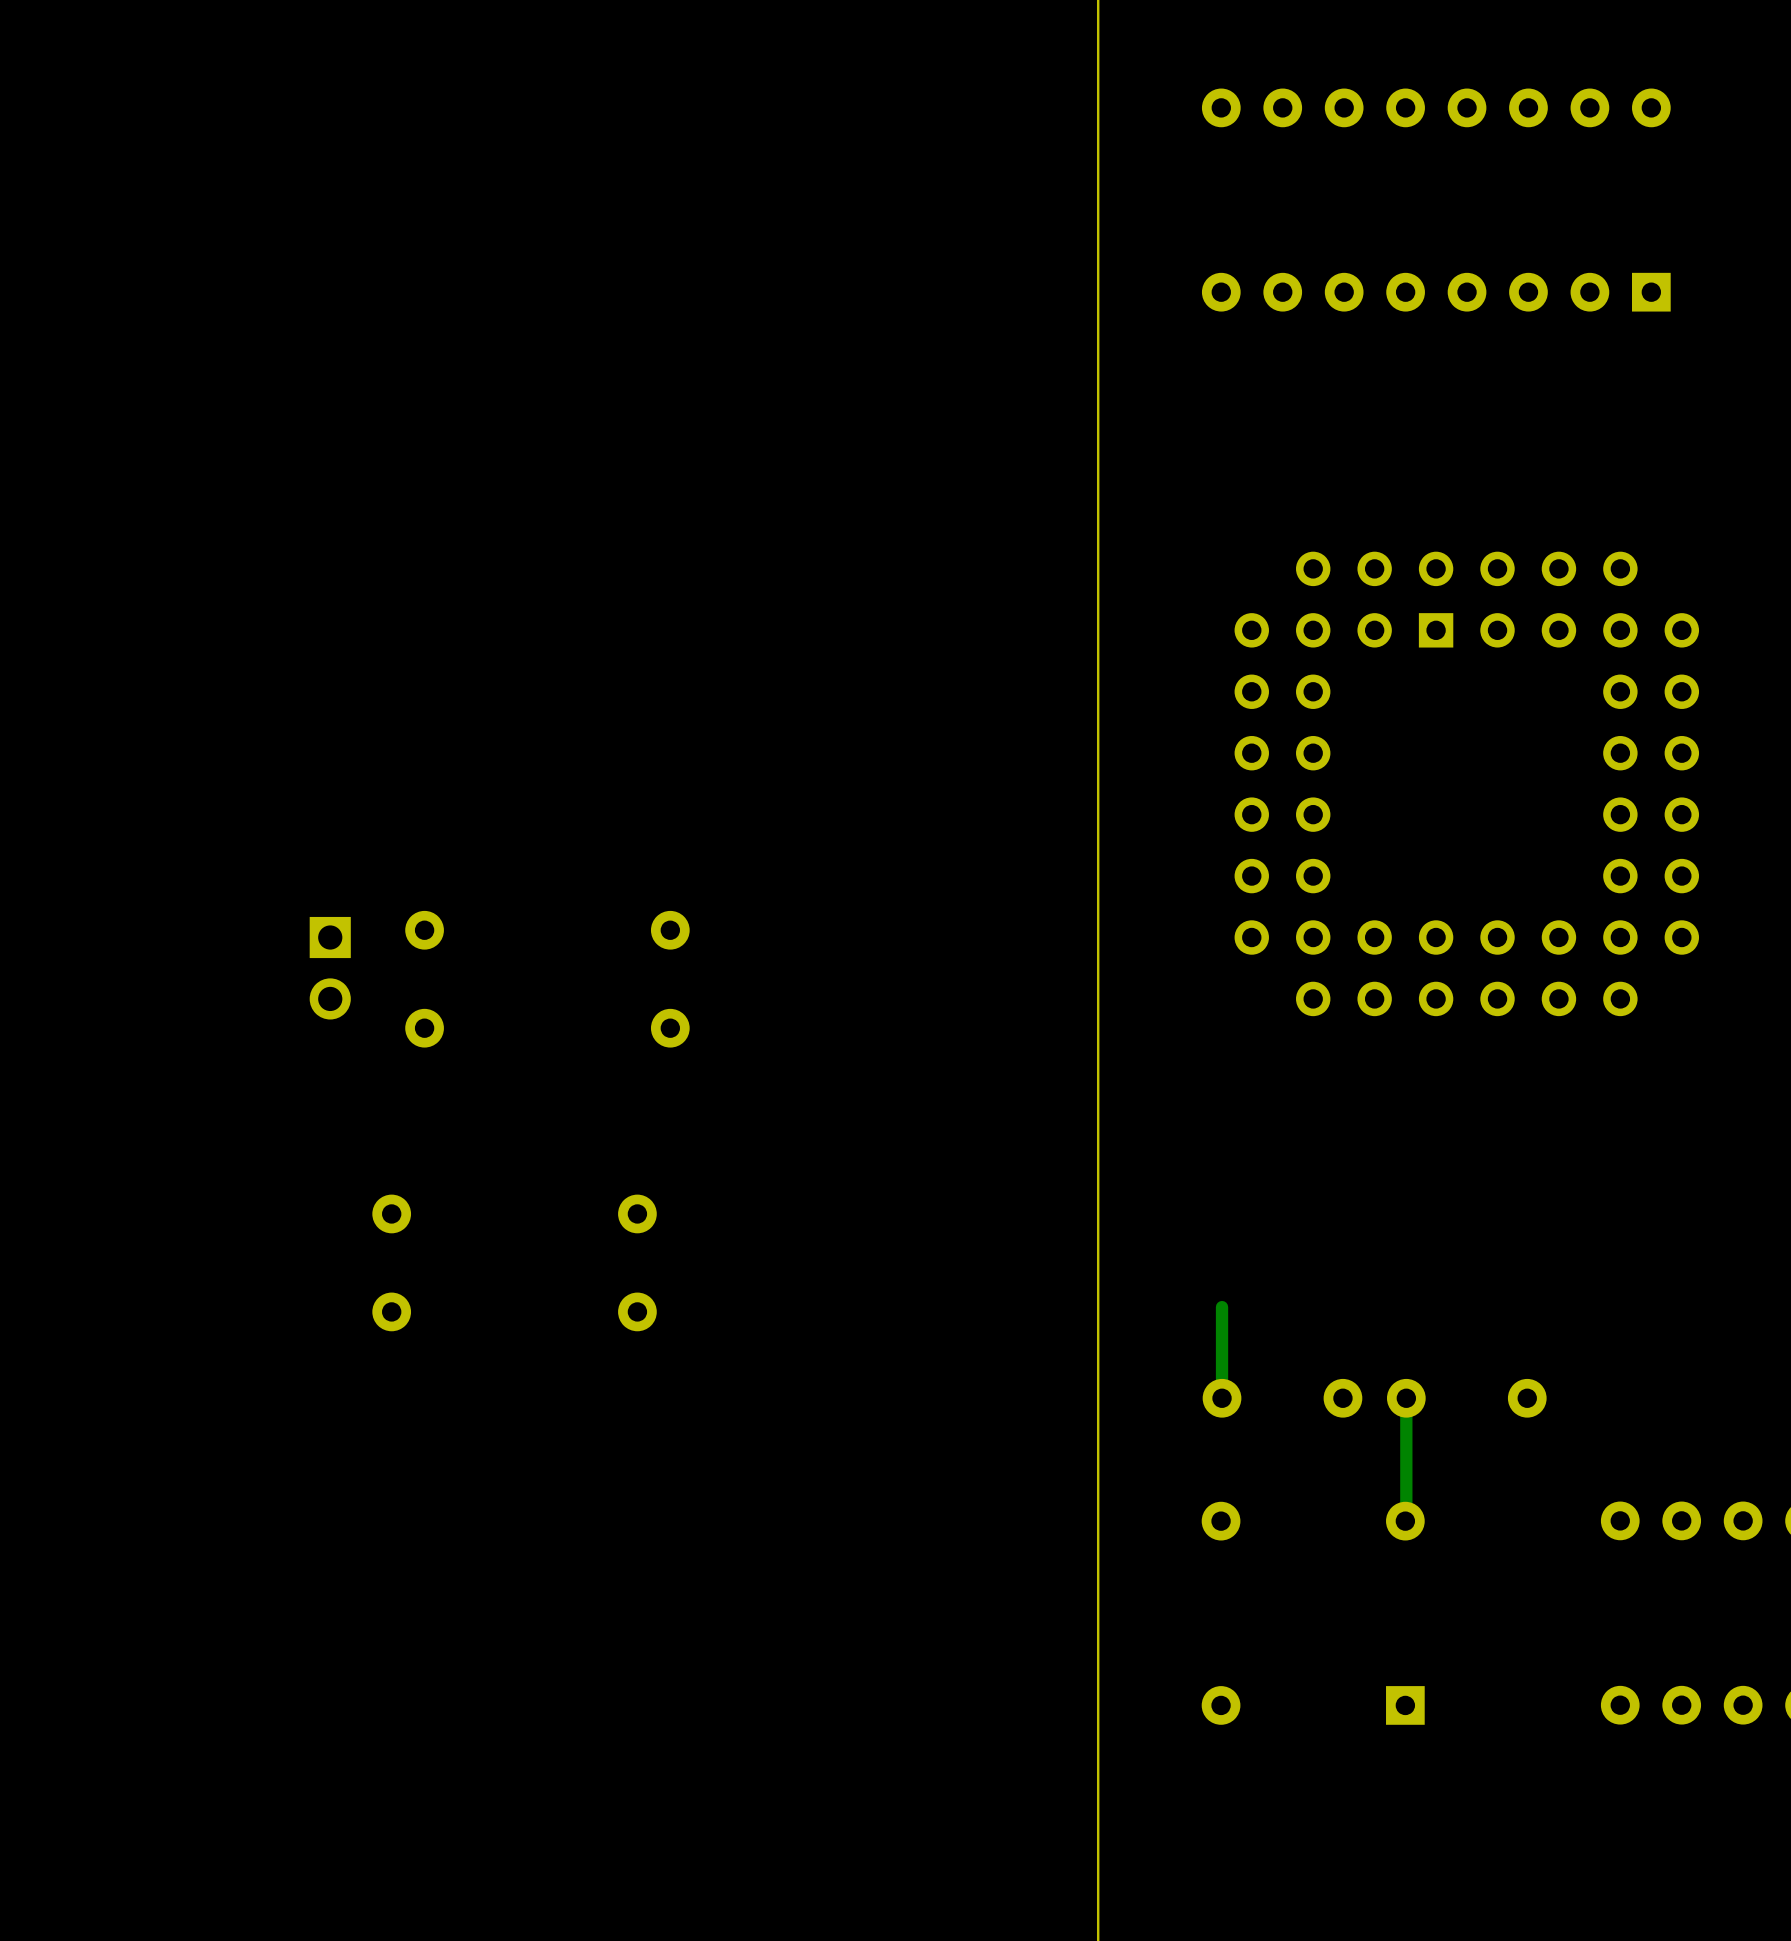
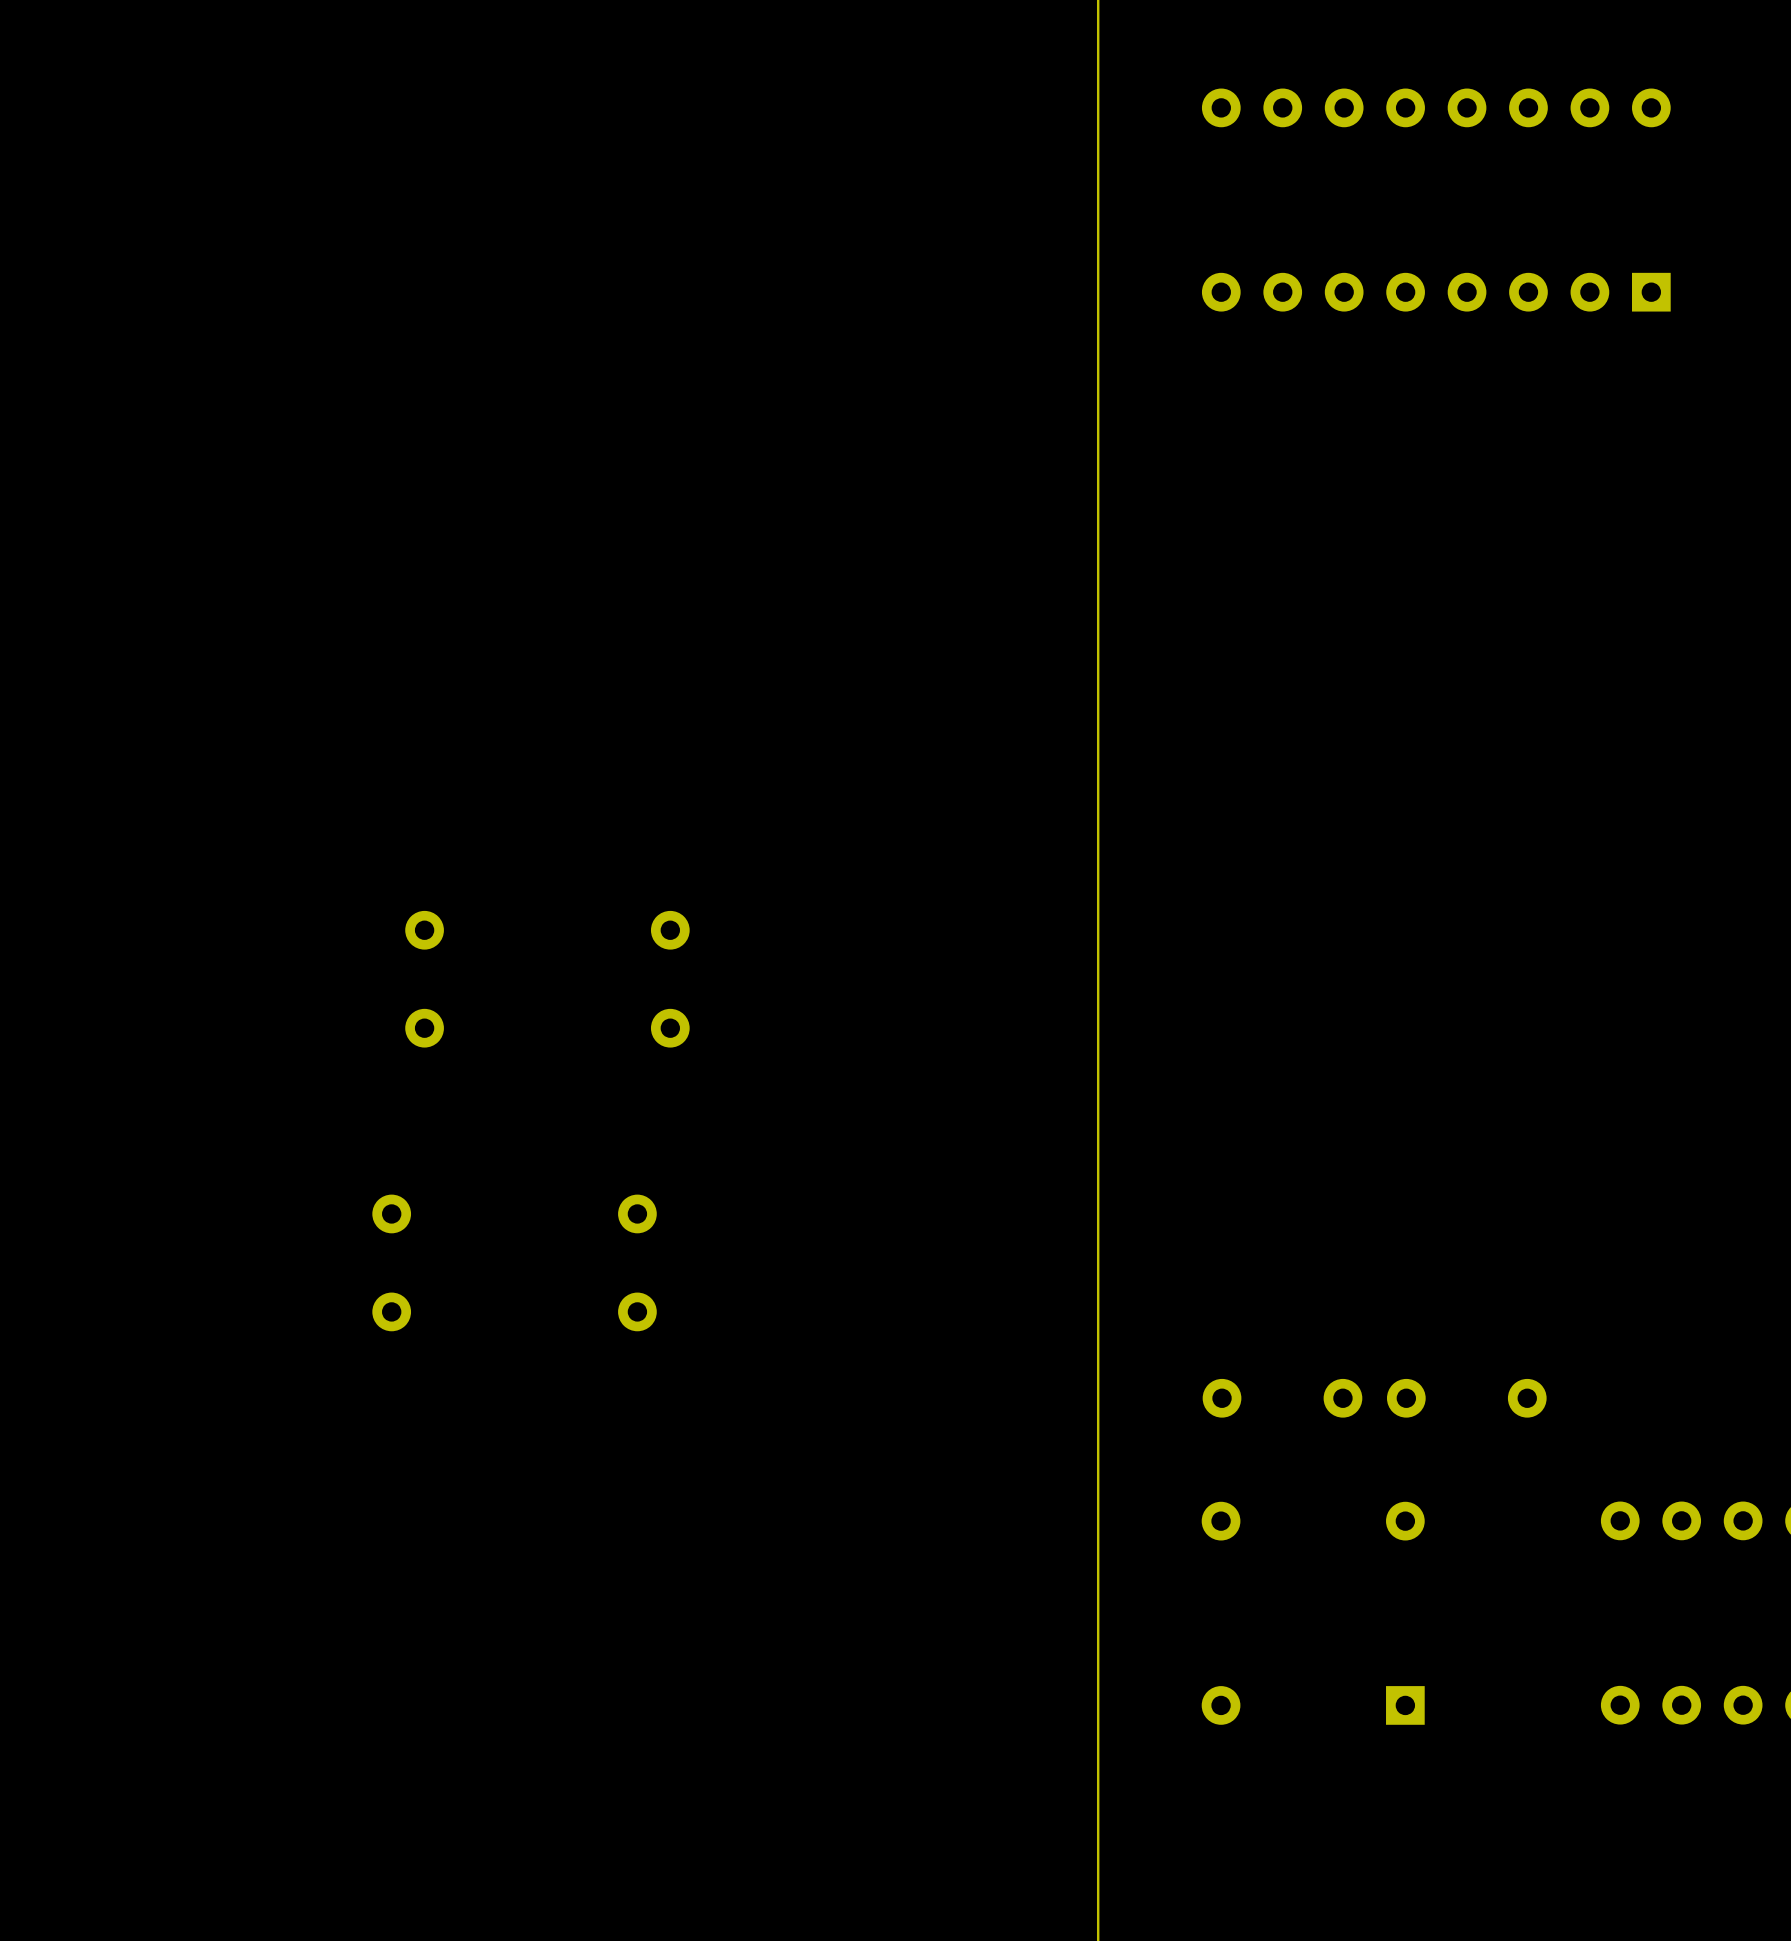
part: (1466, 783) -> none
part: (330, 968) -> none
track: (1221, 1306) (1222, 1398) -> none
track: (1406, 1398) (1405, 1521) -> none

